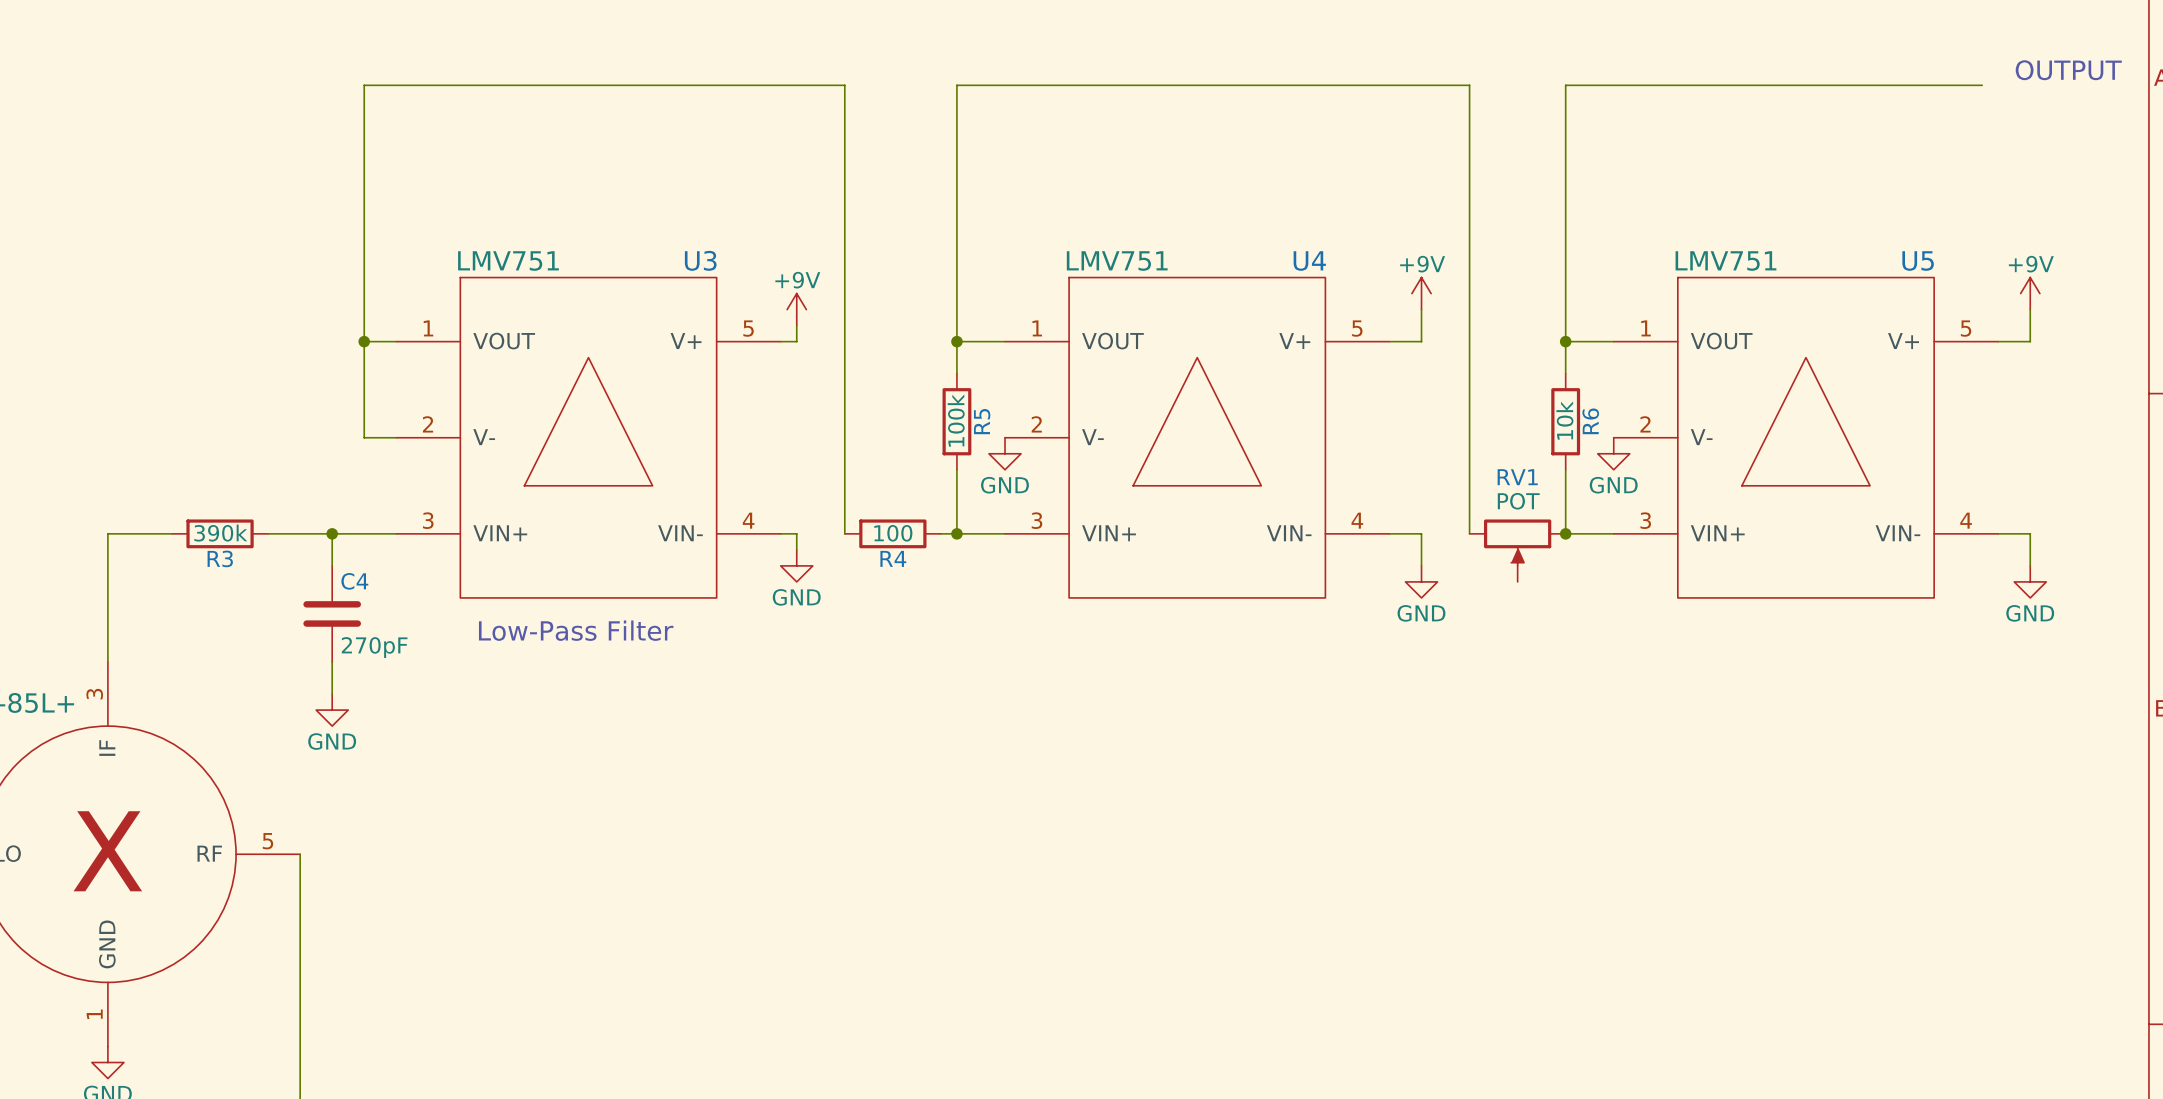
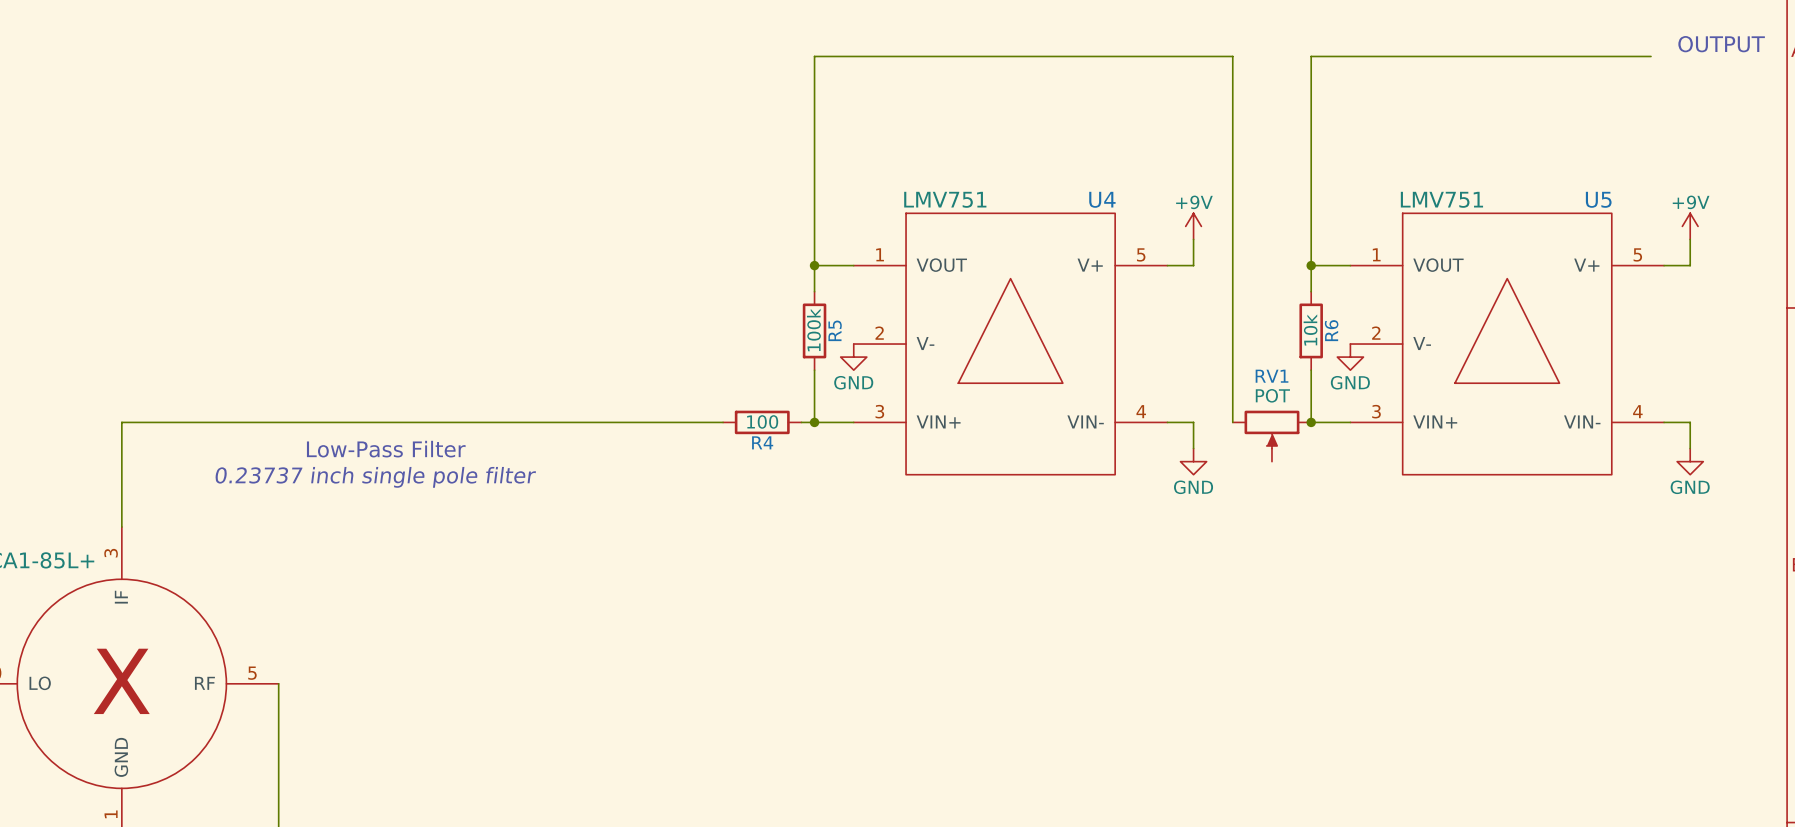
power symbol: +9V (796, 309) -> none
wire: (796, 325) (796, 341) (780, 341) -> none
wire: (364, 341) (396, 341) -> none
junction: (364, 341) -> none
wire: (396, 437) (364, 437) (364, 85) (844, 85) (844, 533) -> none
U3: LMV751 (588, 437) -> none
R3: 390k (220, 533) -> none
wire: (332, 533) (332, 565) -> none
junction: (332, 533) -> none
wire: none -> (357, 422) (670, 422)
wire: (796, 533) (796, 549) -> (683, 422) (723, 422)
power symbol: GND (796, 565) -> none
text: none -> 0.23737 inch single pole filter (375, 477)
C4: 270pF (332, 613) -> none
text position: Low-Pass Filter (576, 630) -> Low-Pass Filter (386, 449)
wire: (332, 662) (332, 694) -> none
power symbol: GND (332, 710) -> none

